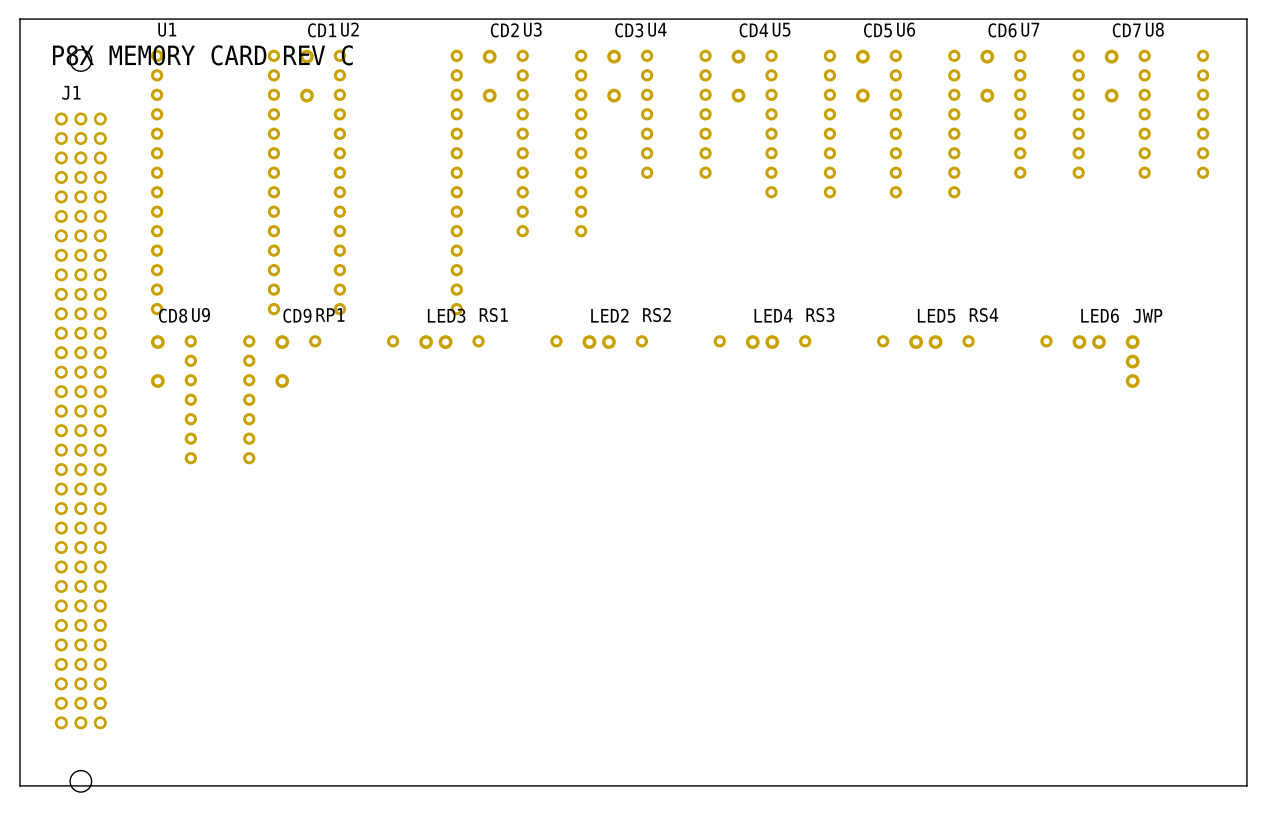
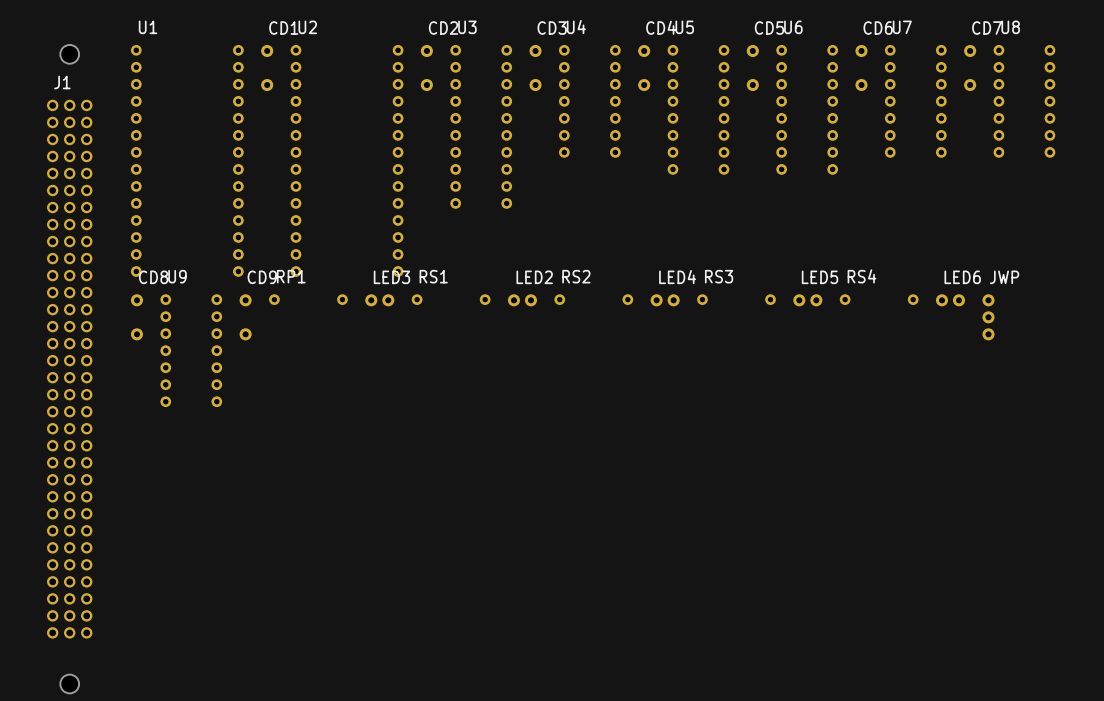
board edge: (19, 19) (1246, 19) (1246, 785) (19, 785) (19, 19) -> none
text: P8X MEMORY CARD REV C (202, 55) -> none

